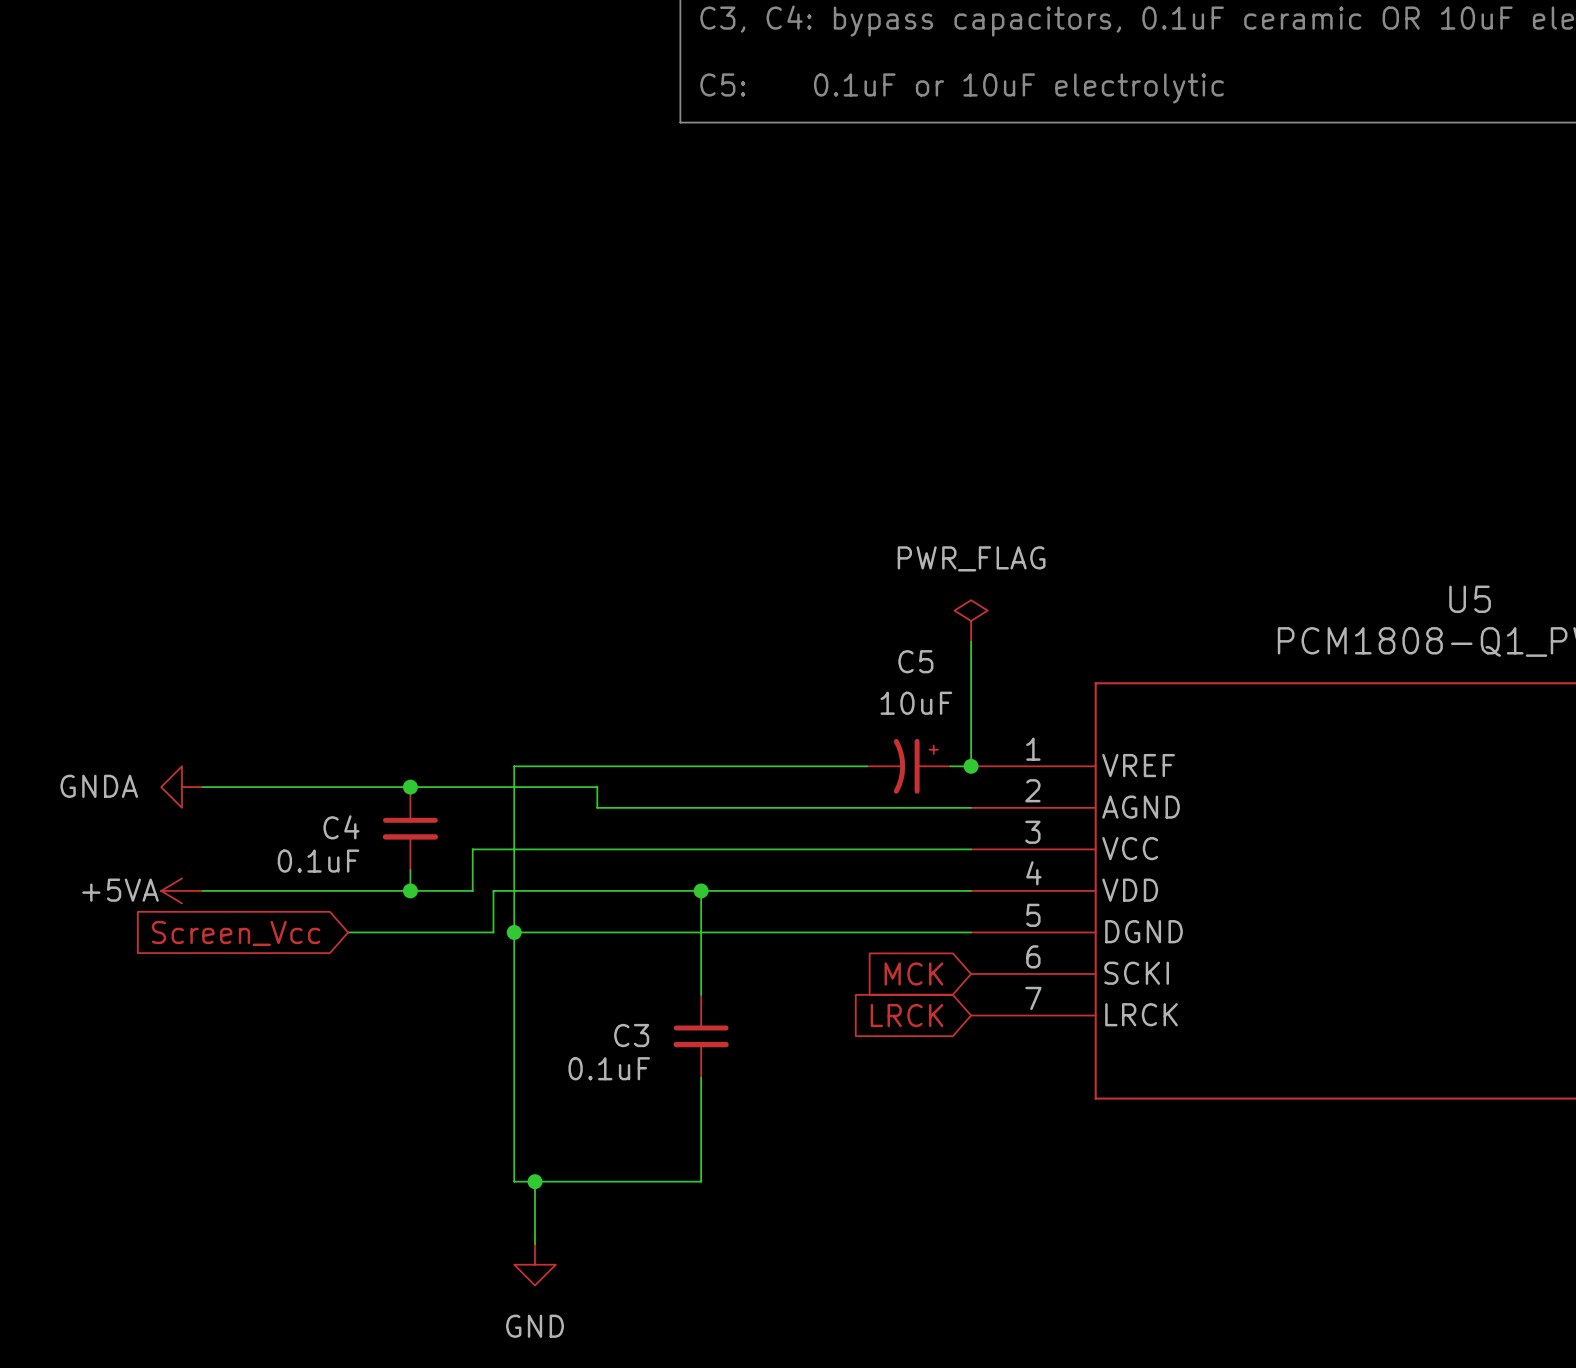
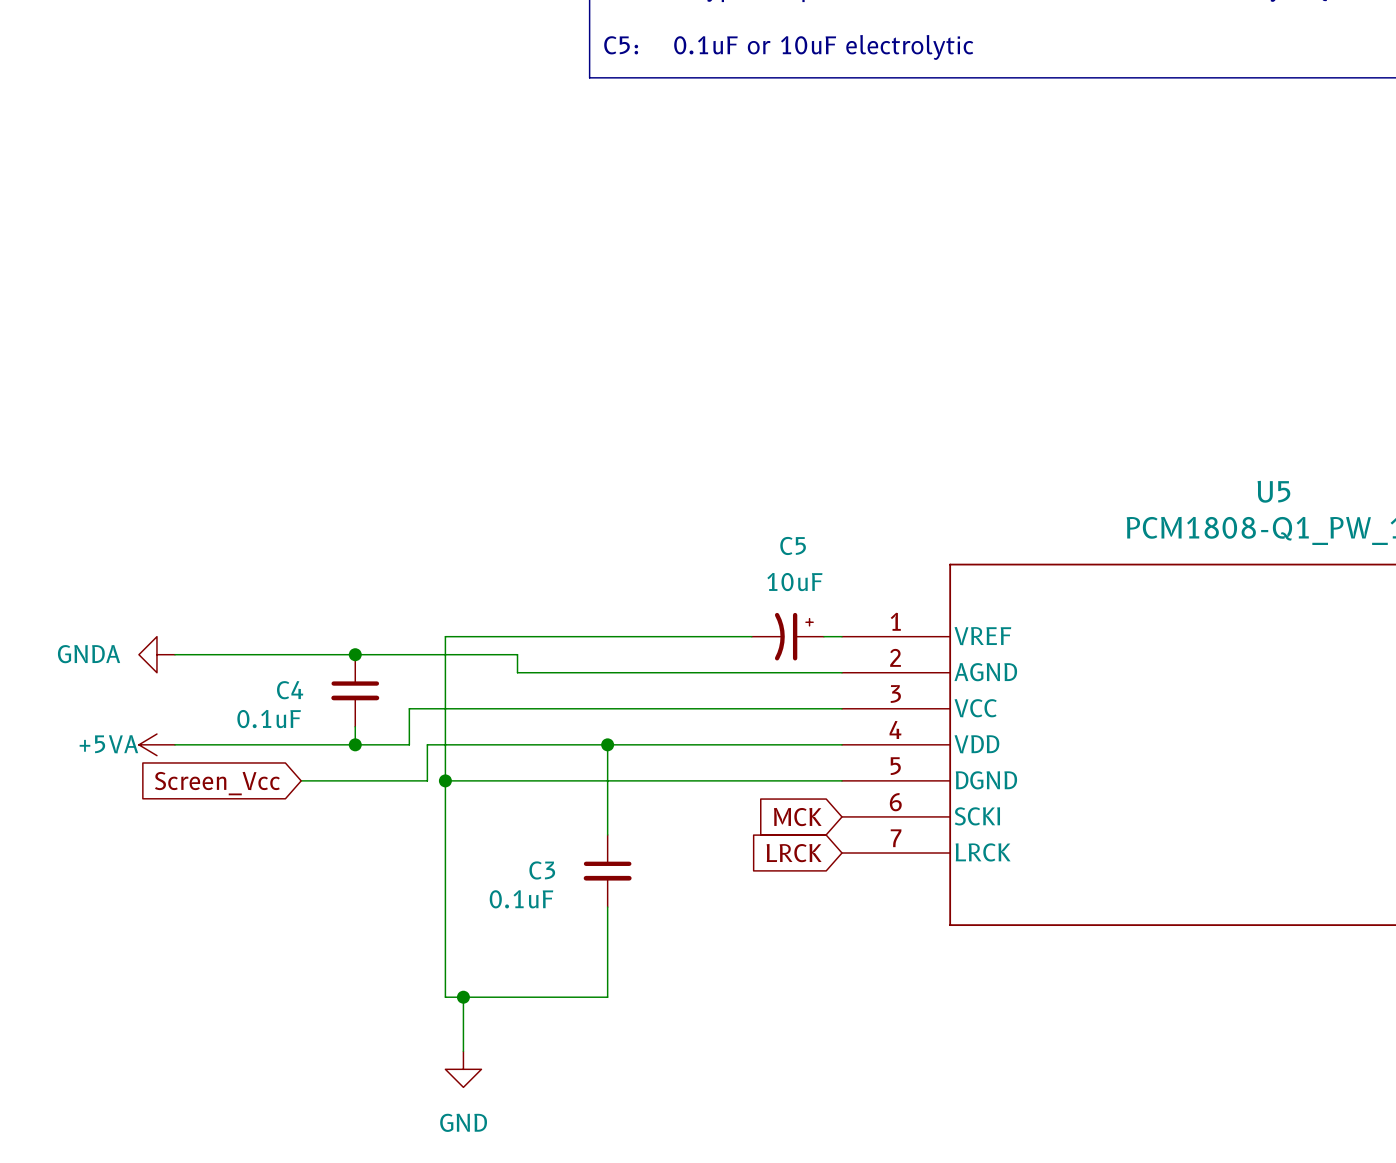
power symbol: PWR_FLAG (971, 620) -> none
wire: (971, 641) (971, 766) -> none
junction: (971, 766) -> none

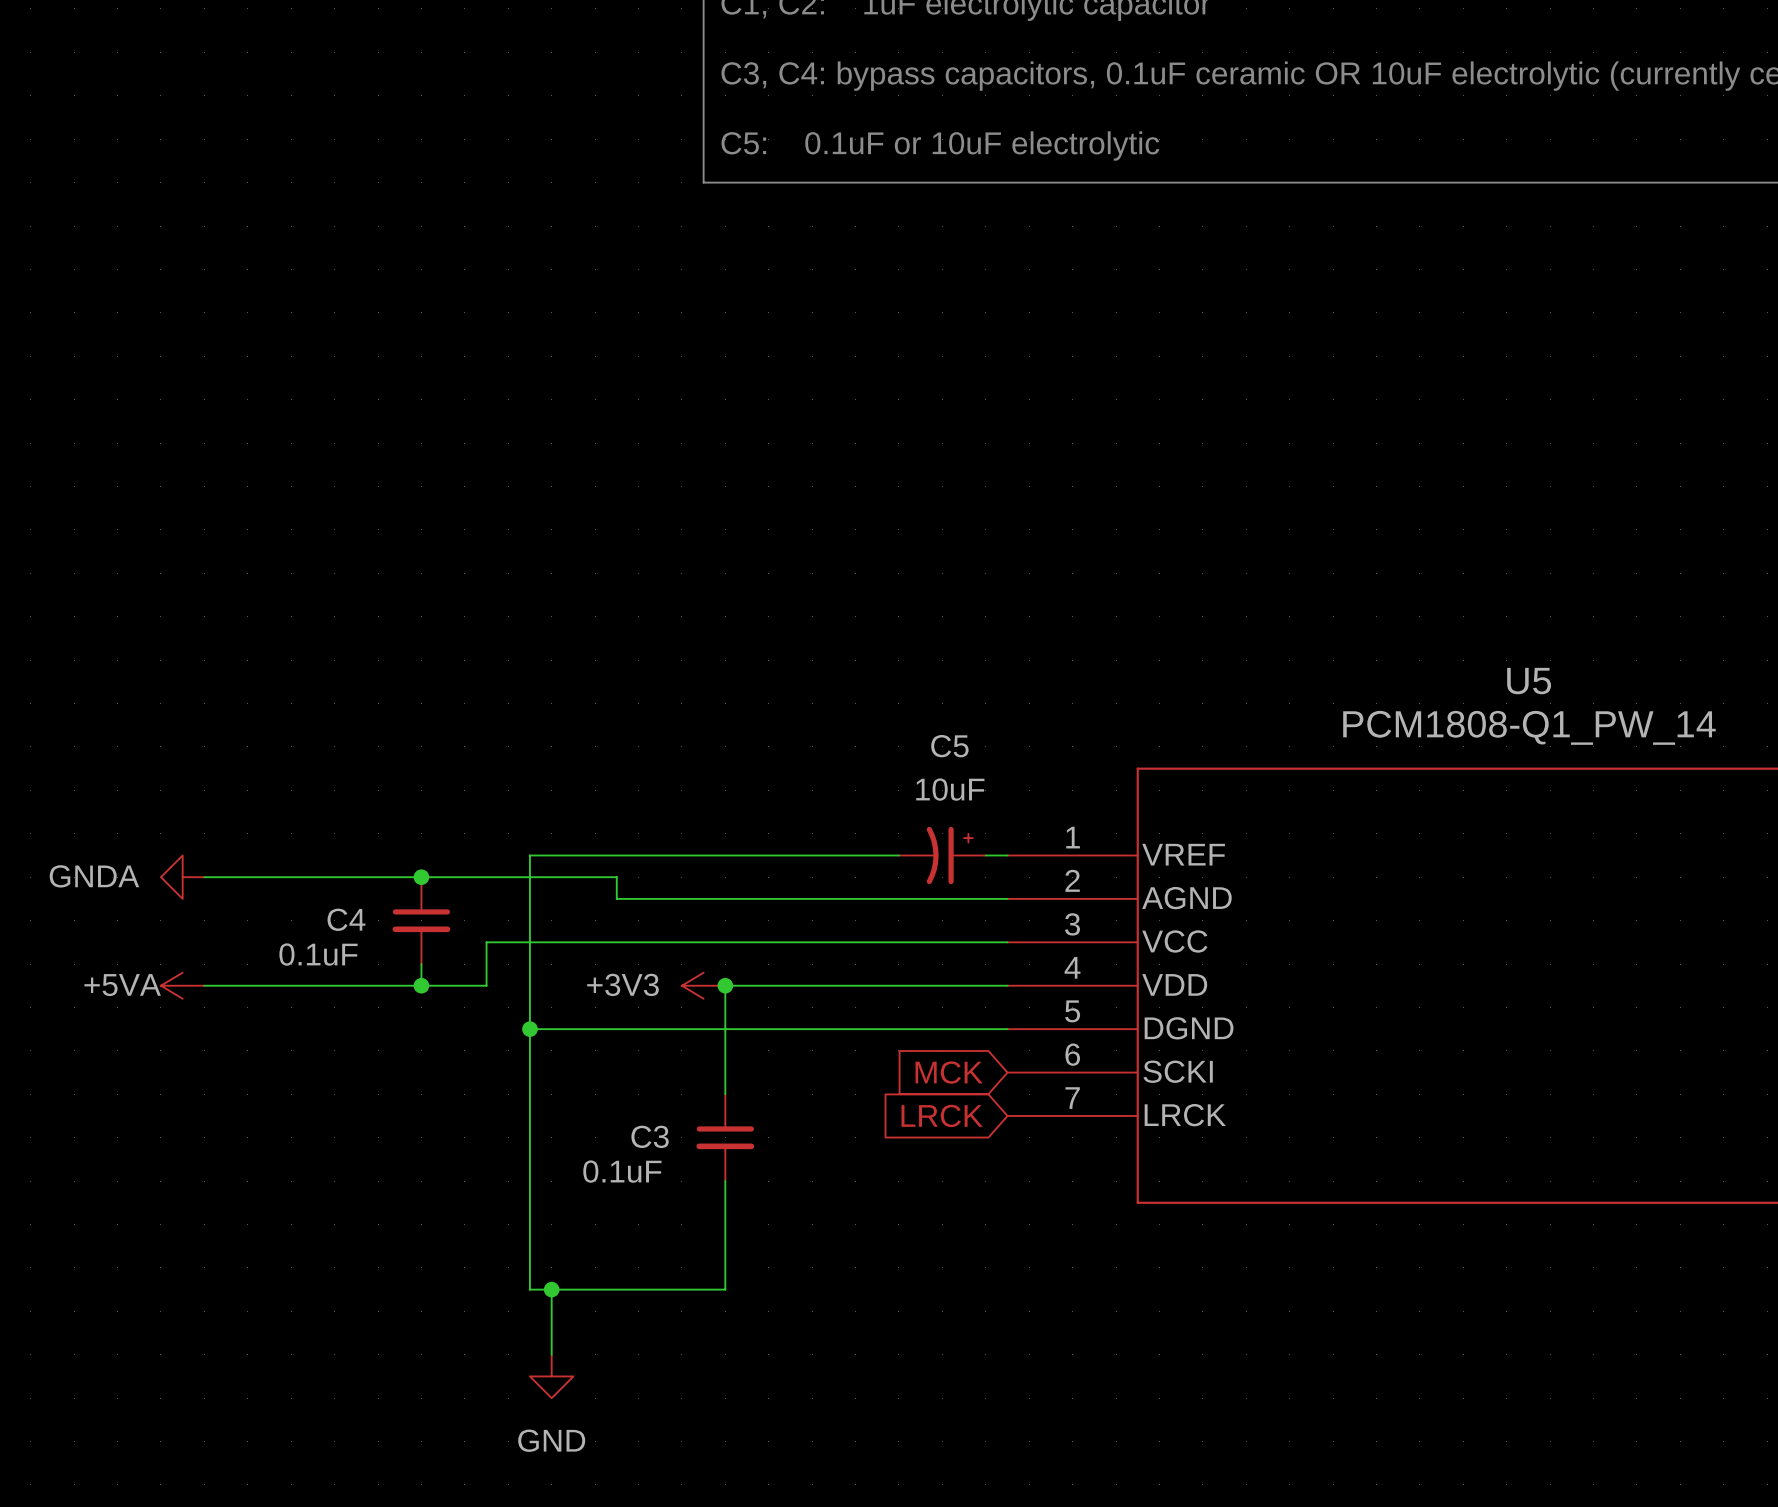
power symbol: none -> +3V3 (703, 985)
wire: (607, 744) (427, 744) (427, 780) (301, 780) -> none
global label: Screen_Vcc (217, 783) -> none

